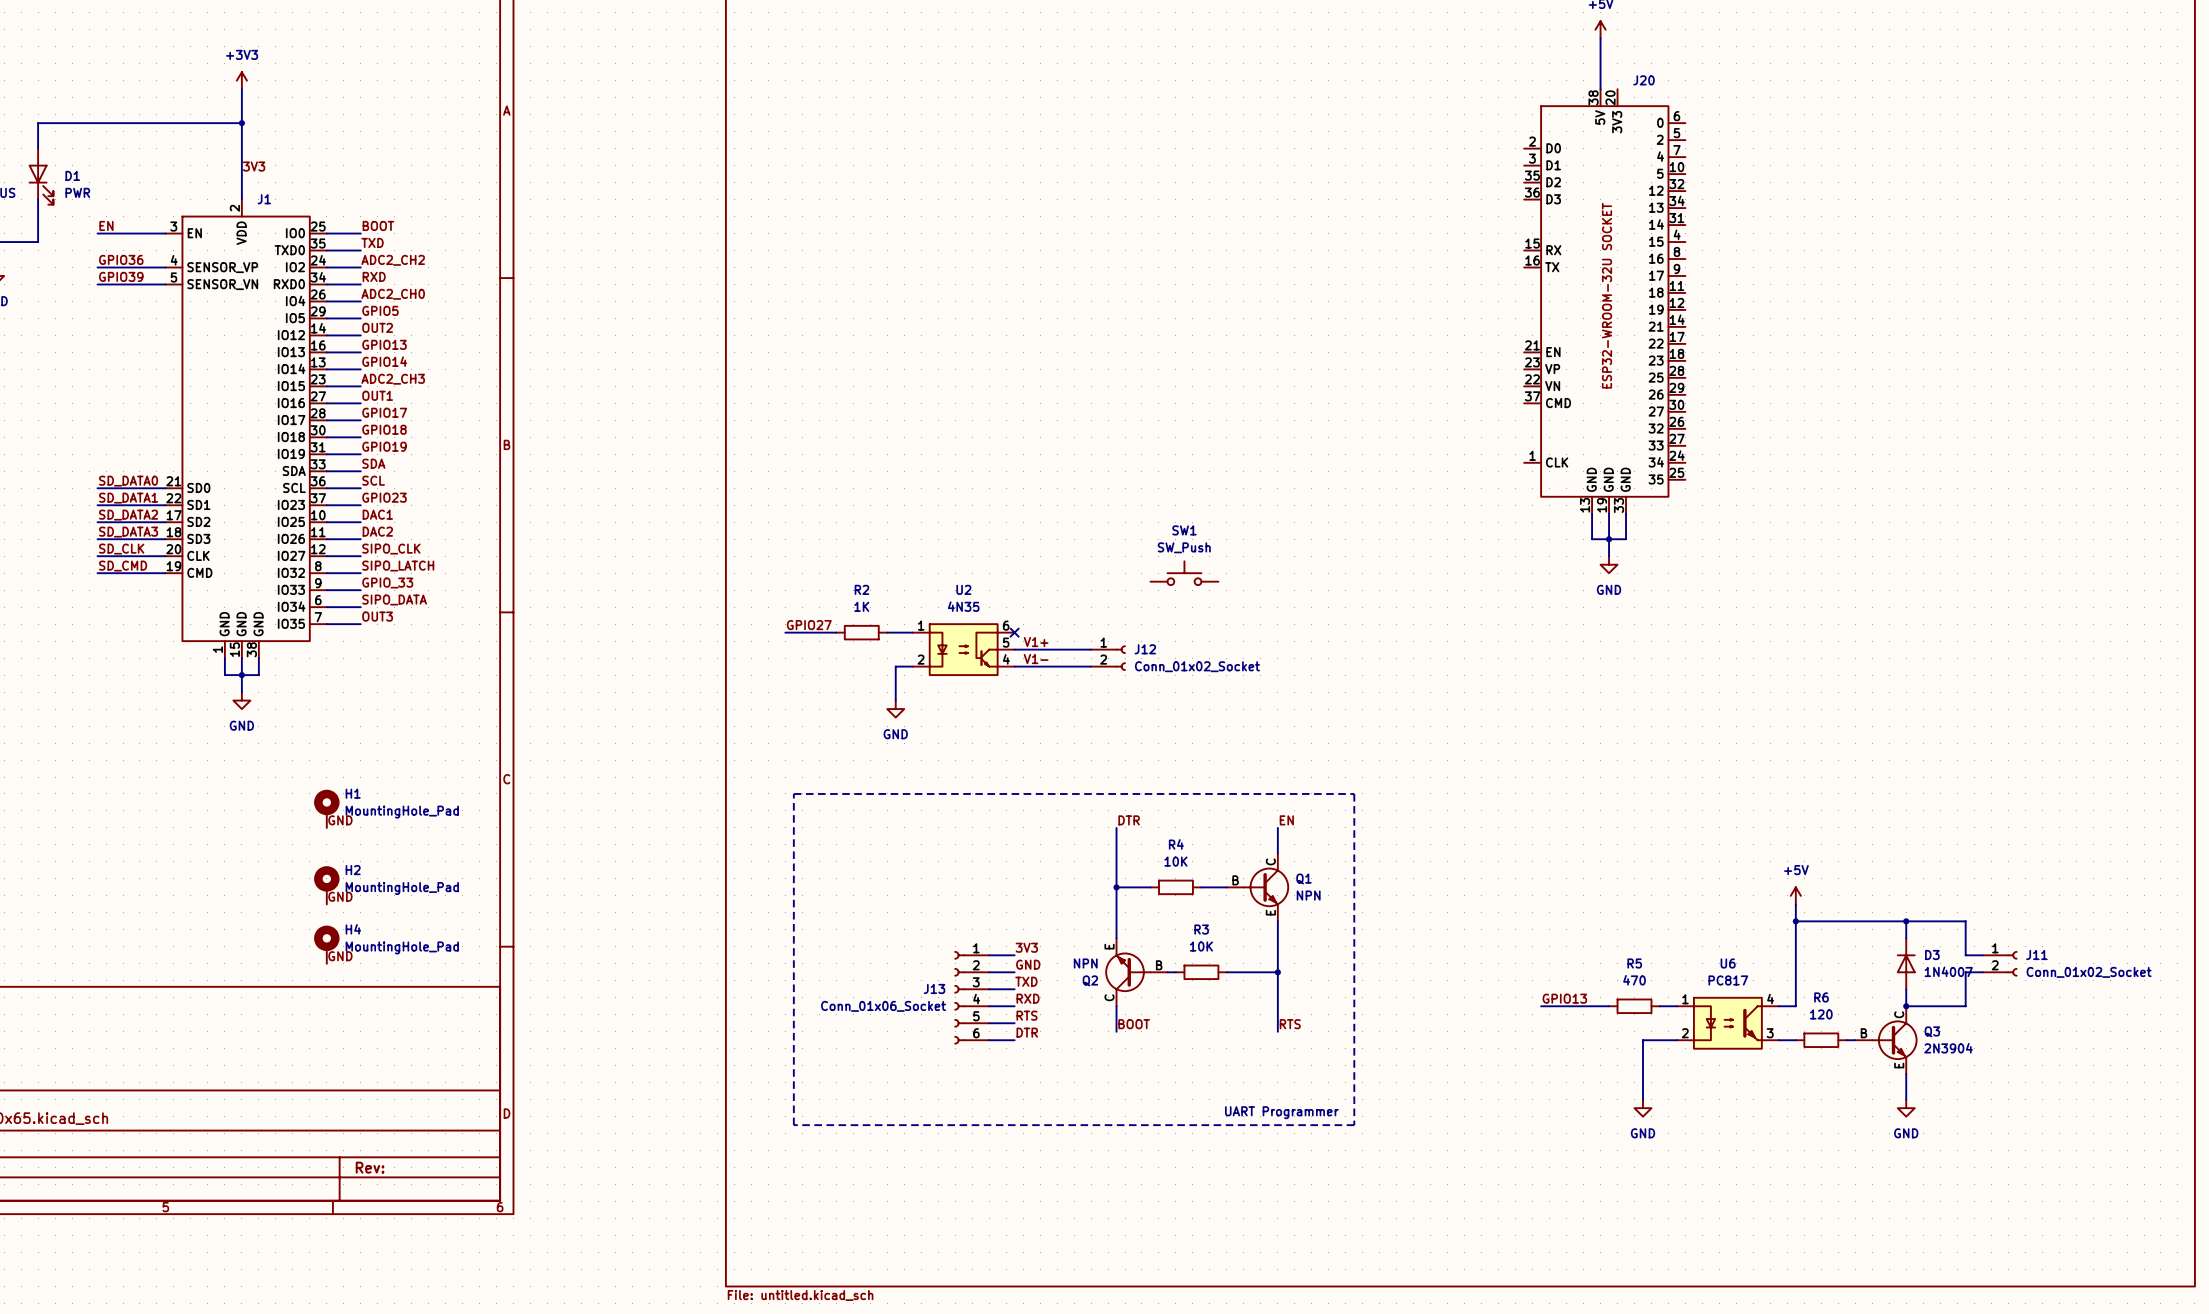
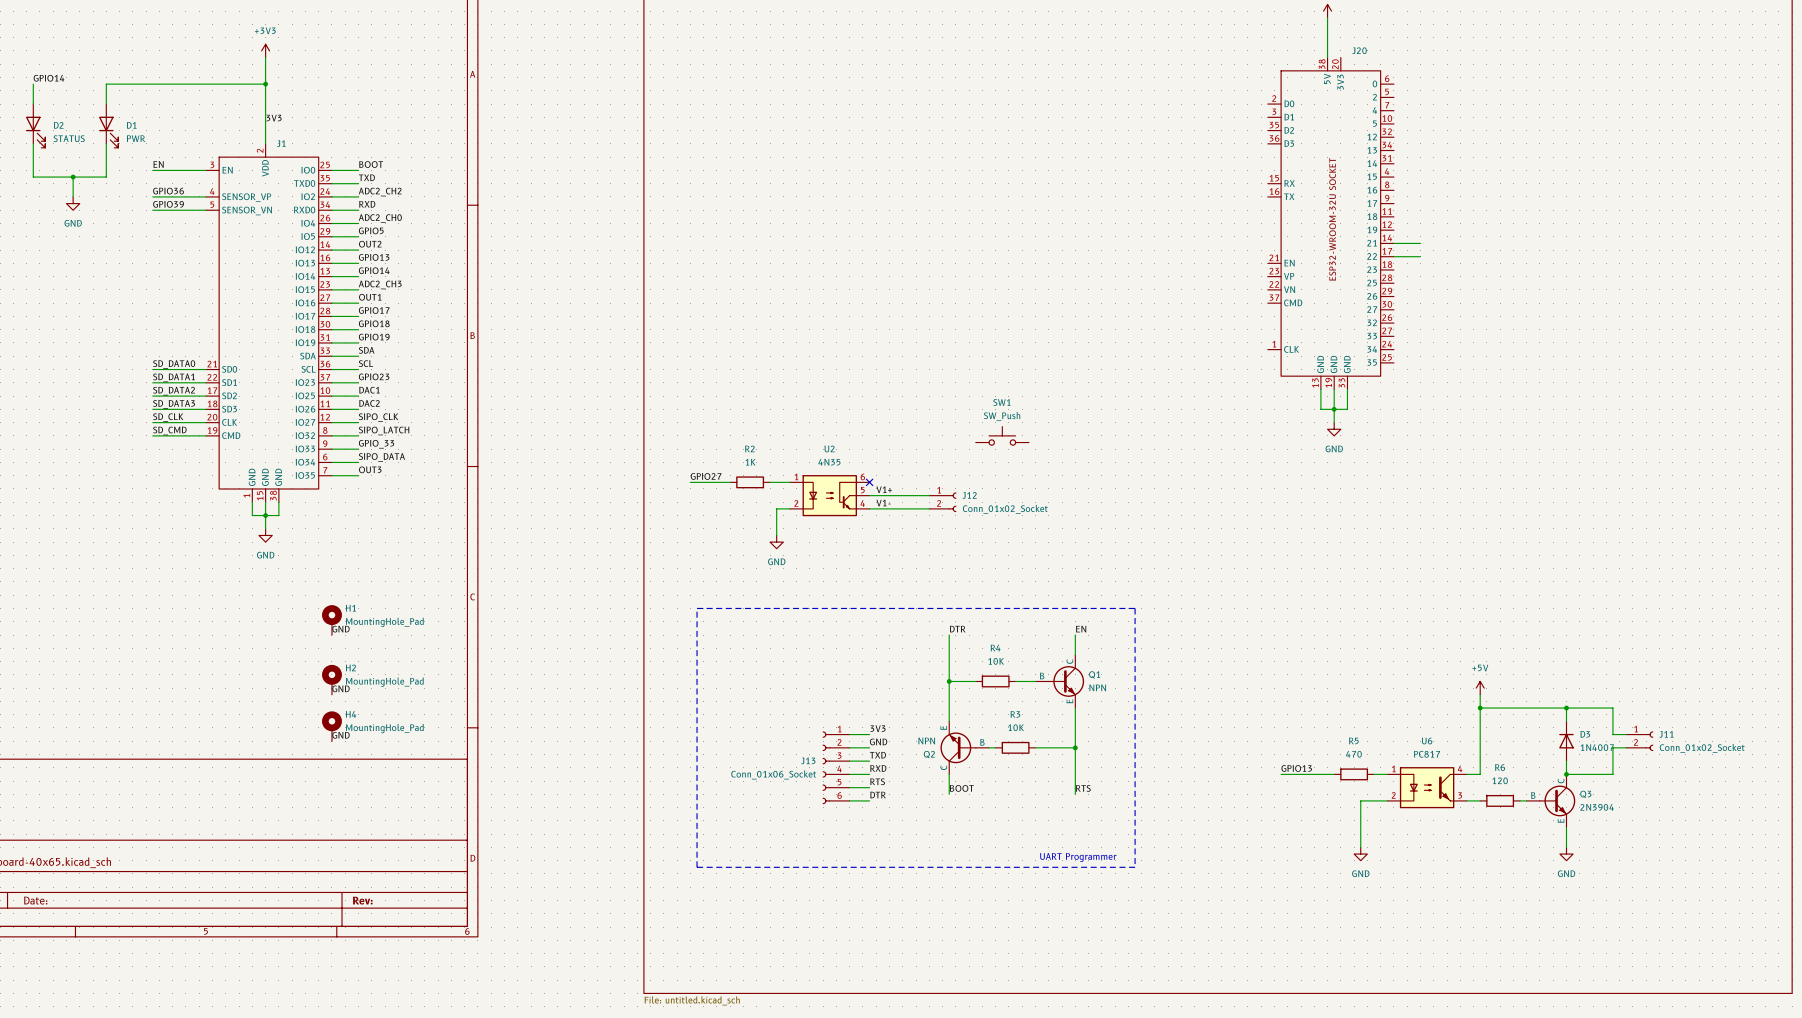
wire: none -> (1393, 243) (1420, 243)
wire: none -> (1393, 256) (1420, 256)

